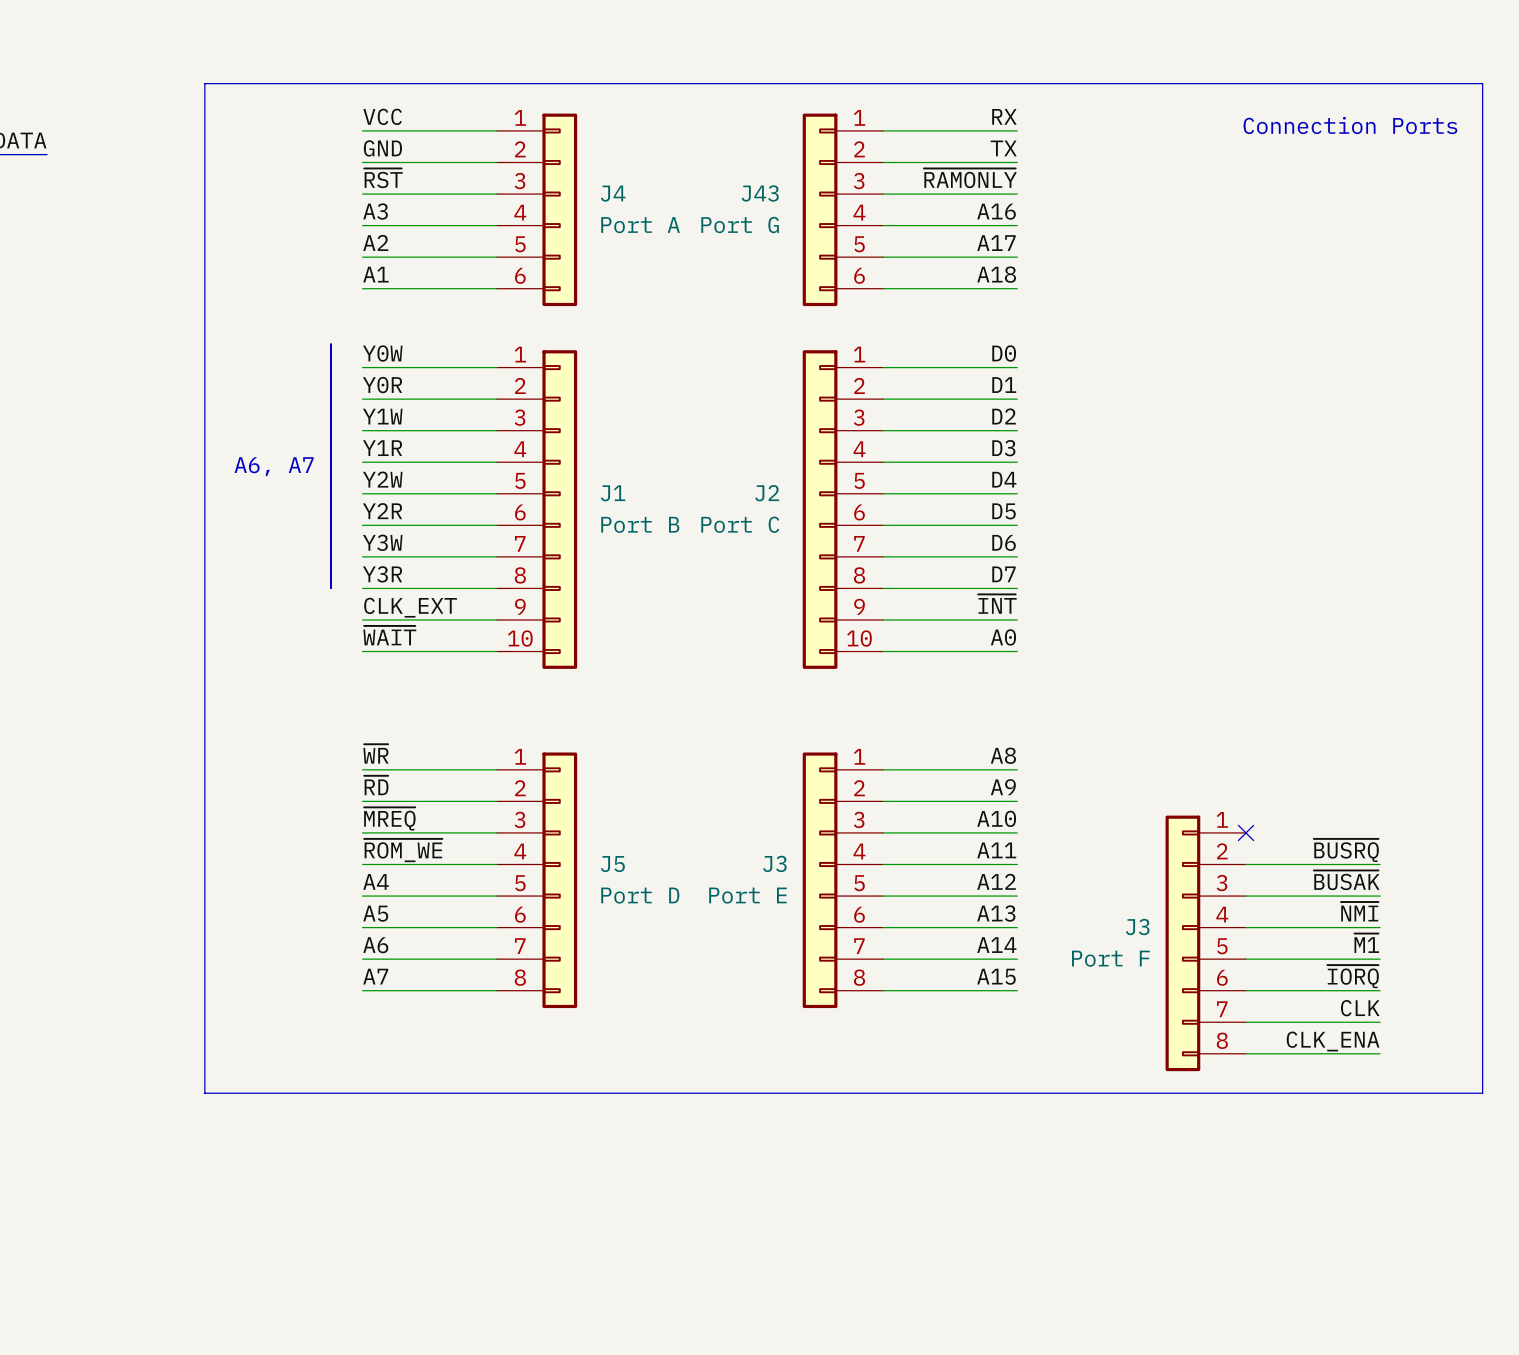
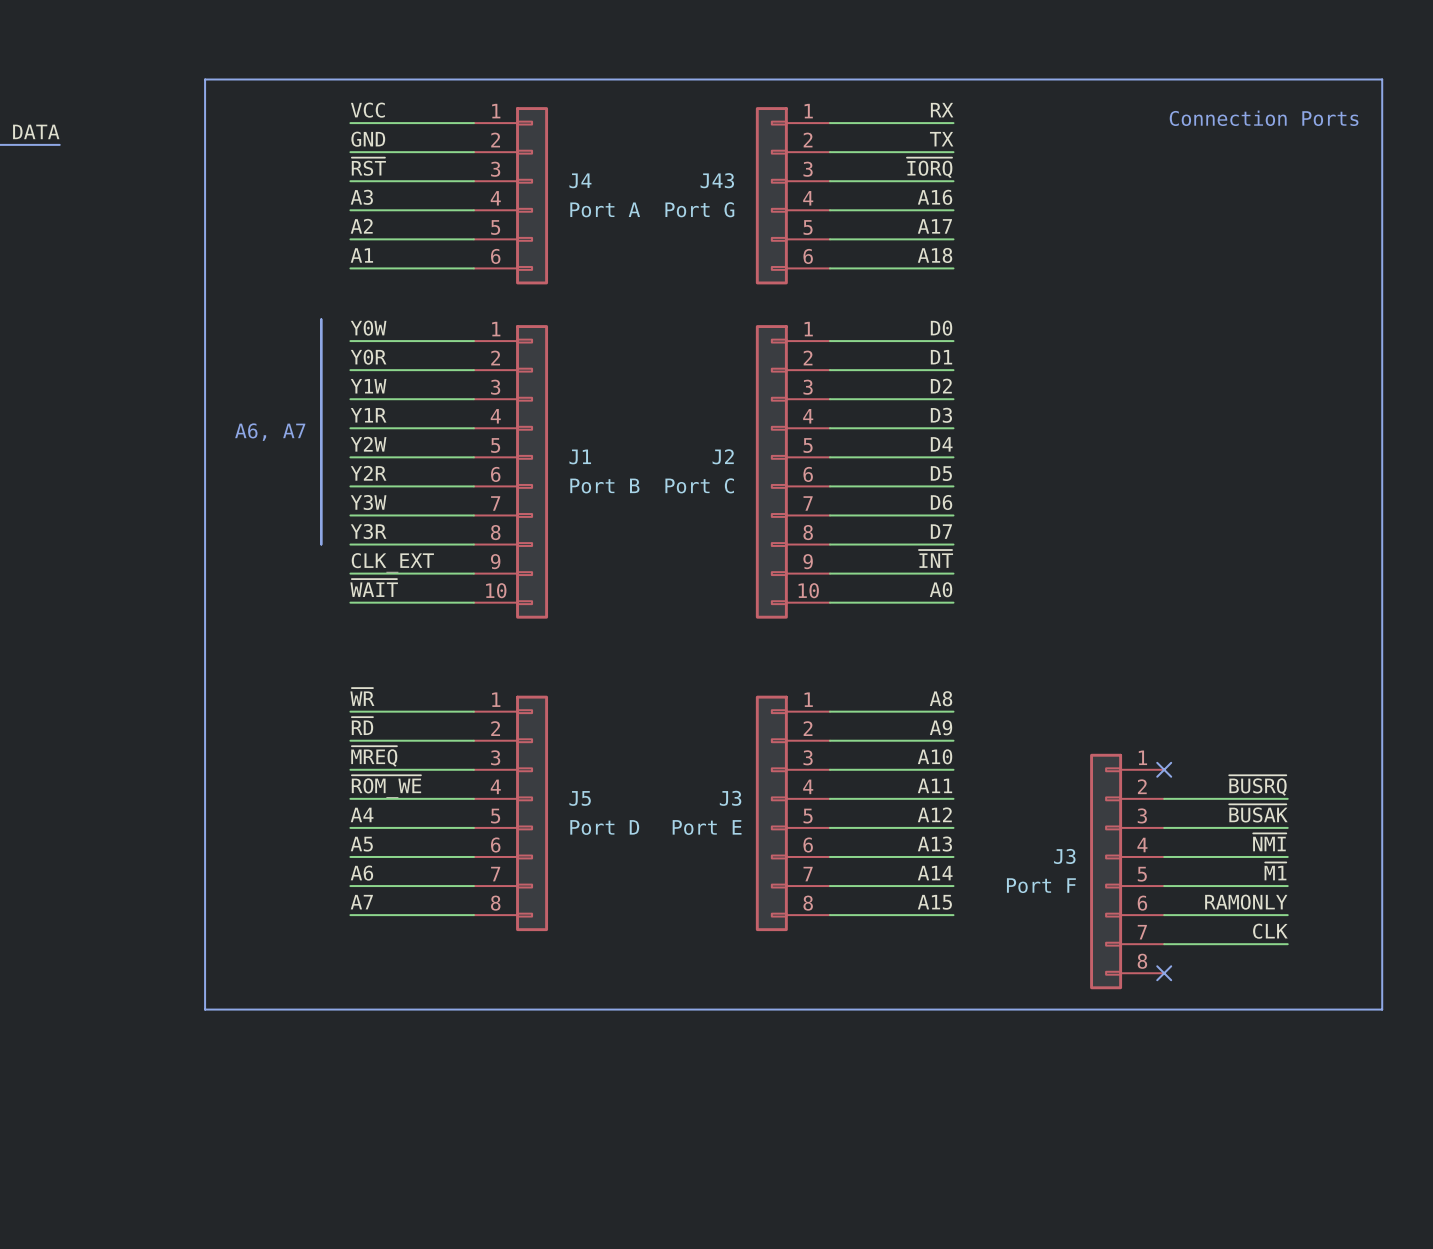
label: ~{RAMONLY} (970, 178) -> ~{IORQ} (929, 167)
label: ~{IORQ} (1353, 976) -> RAMONLY (1246, 902)
label: CLK_ENA (1333, 1041) -> none
wire: (1246, 1053) (1380, 1053) -> none
no-connect mark: none -> (1164, 973)

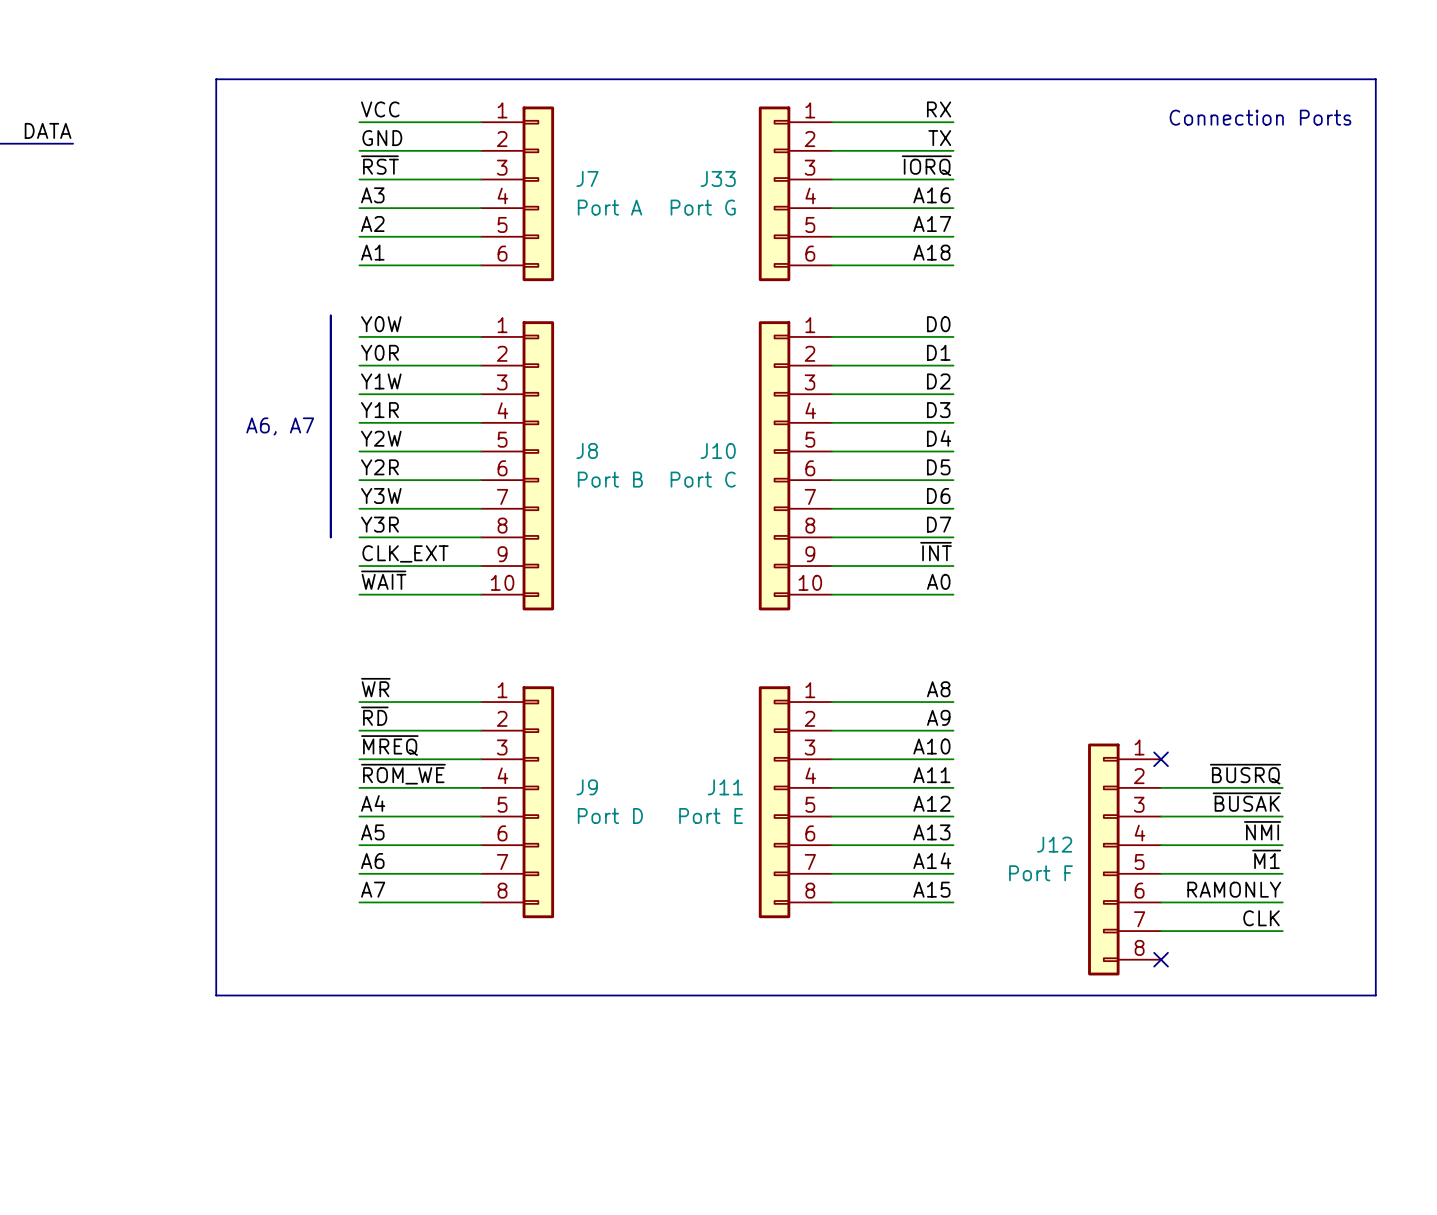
J4 name: J4 (580, 180) -> J7 (587, 178)
J43 name: J43 (717, 180) -> J33 (718, 178)
J1 name: J1 (580, 456) -> J8 (587, 450)
J2 name: J2 (723, 456) -> J10 (718, 450)
J5 name: J5 (580, 798) -> J9 (587, 787)
J3 name: J3 (730, 798) -> J11 (725, 787)
J3 name: J3 (1064, 856) -> J12 (1054, 844)

